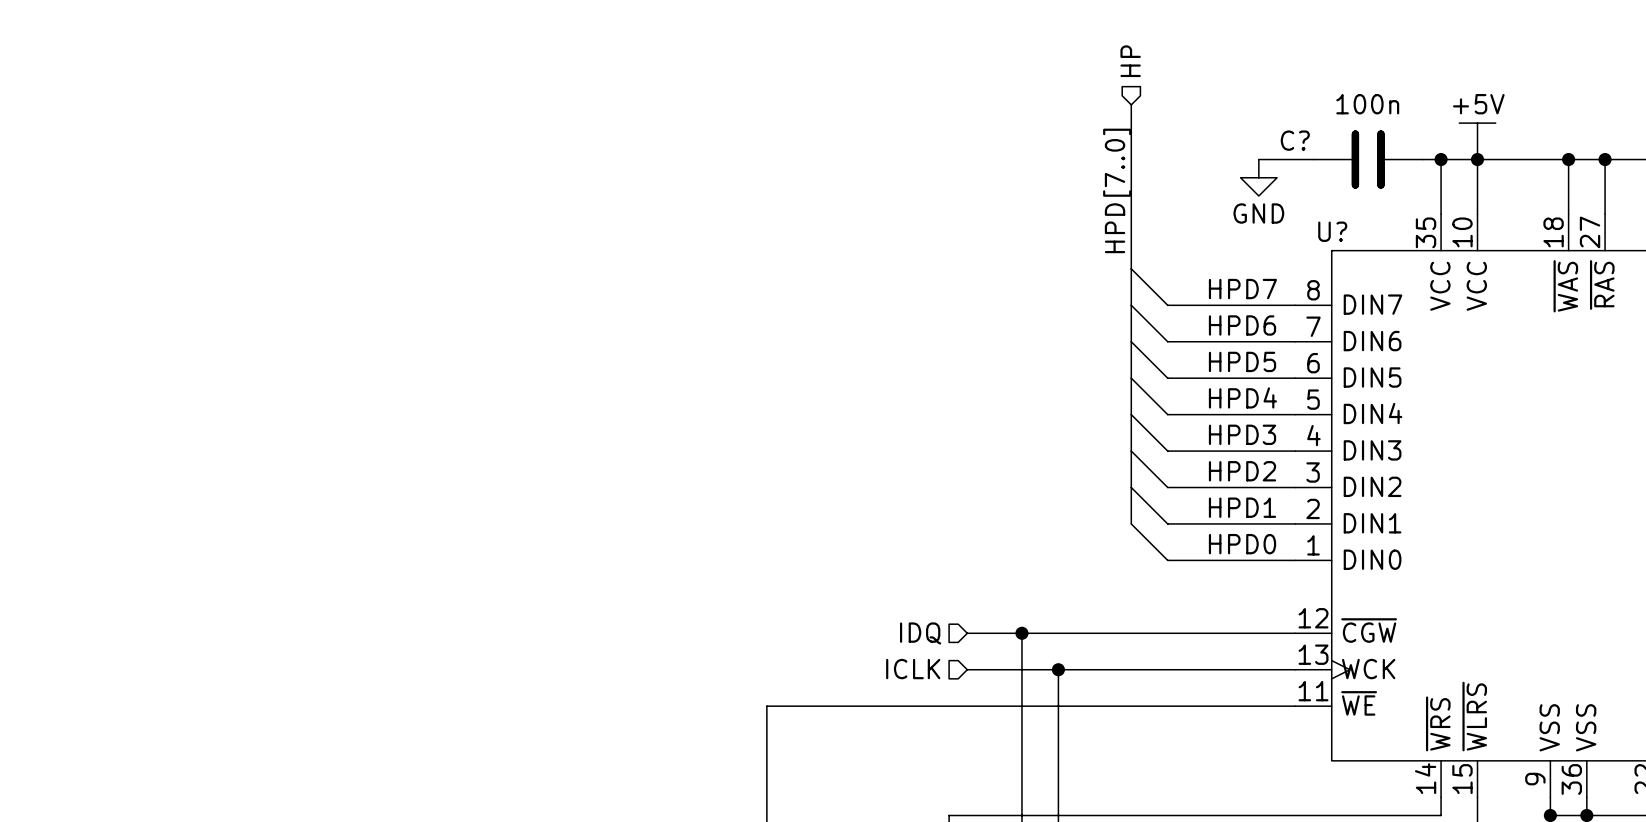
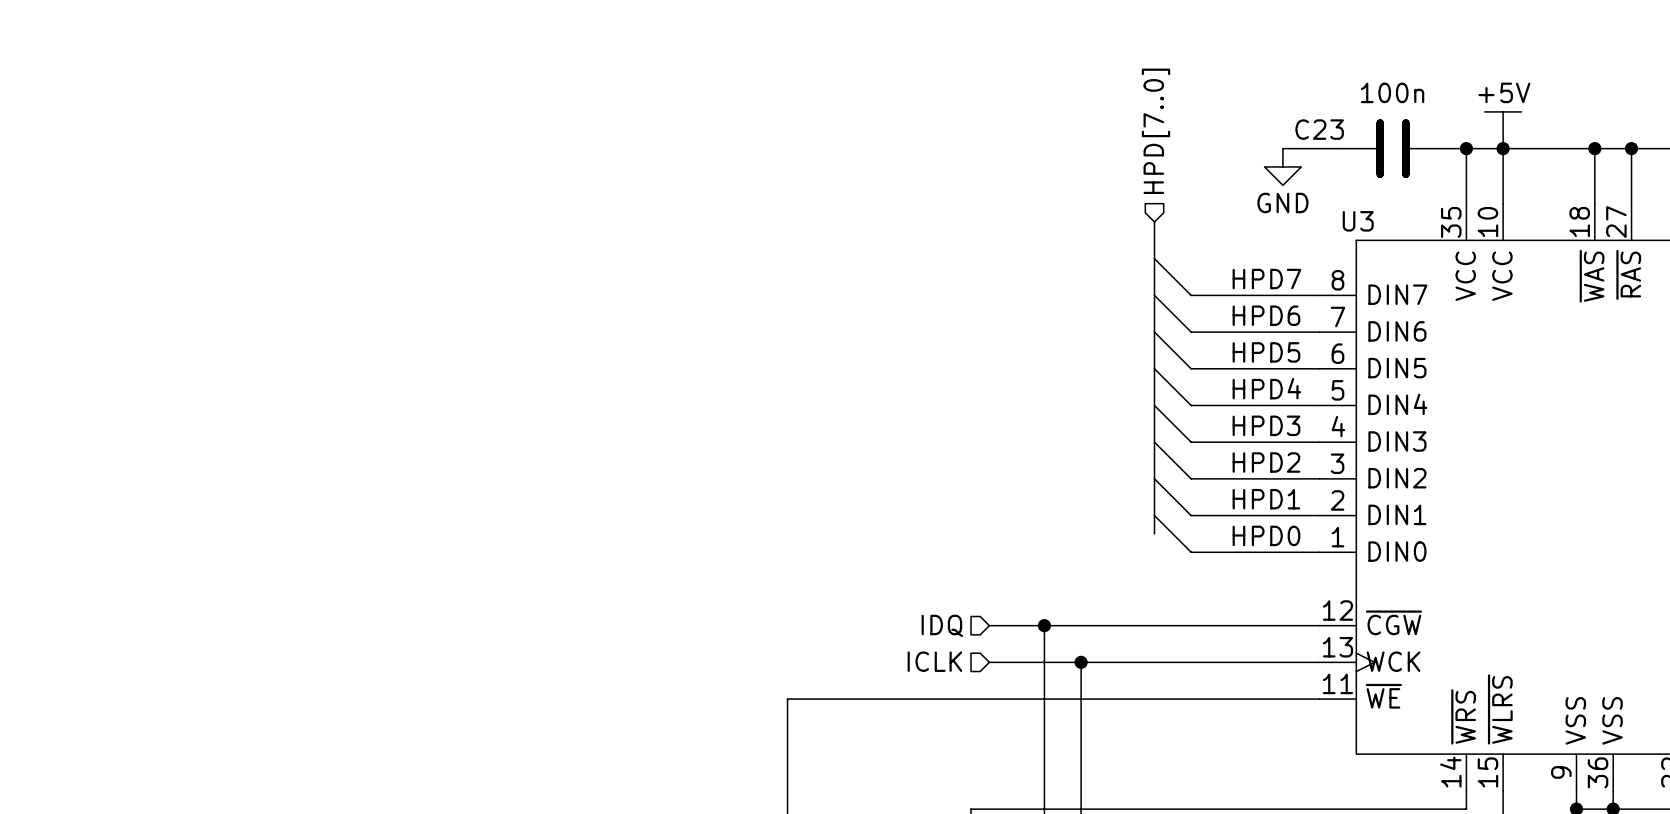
hierarchical label: HP (1130, 61) -> none
bus: (1131, 104) (1131, 232) -> none
C? name: C? (1295, 140) -> C23 (1319, 129)
hierarchical label: none -> HPD[7..0] (1155, 131)
label: HPD[7..0] (1117, 190) -> none
U? name: U? (1332, 231) -> U3 (1358, 221)
bus: none -> (1154, 515) (1154, 533)

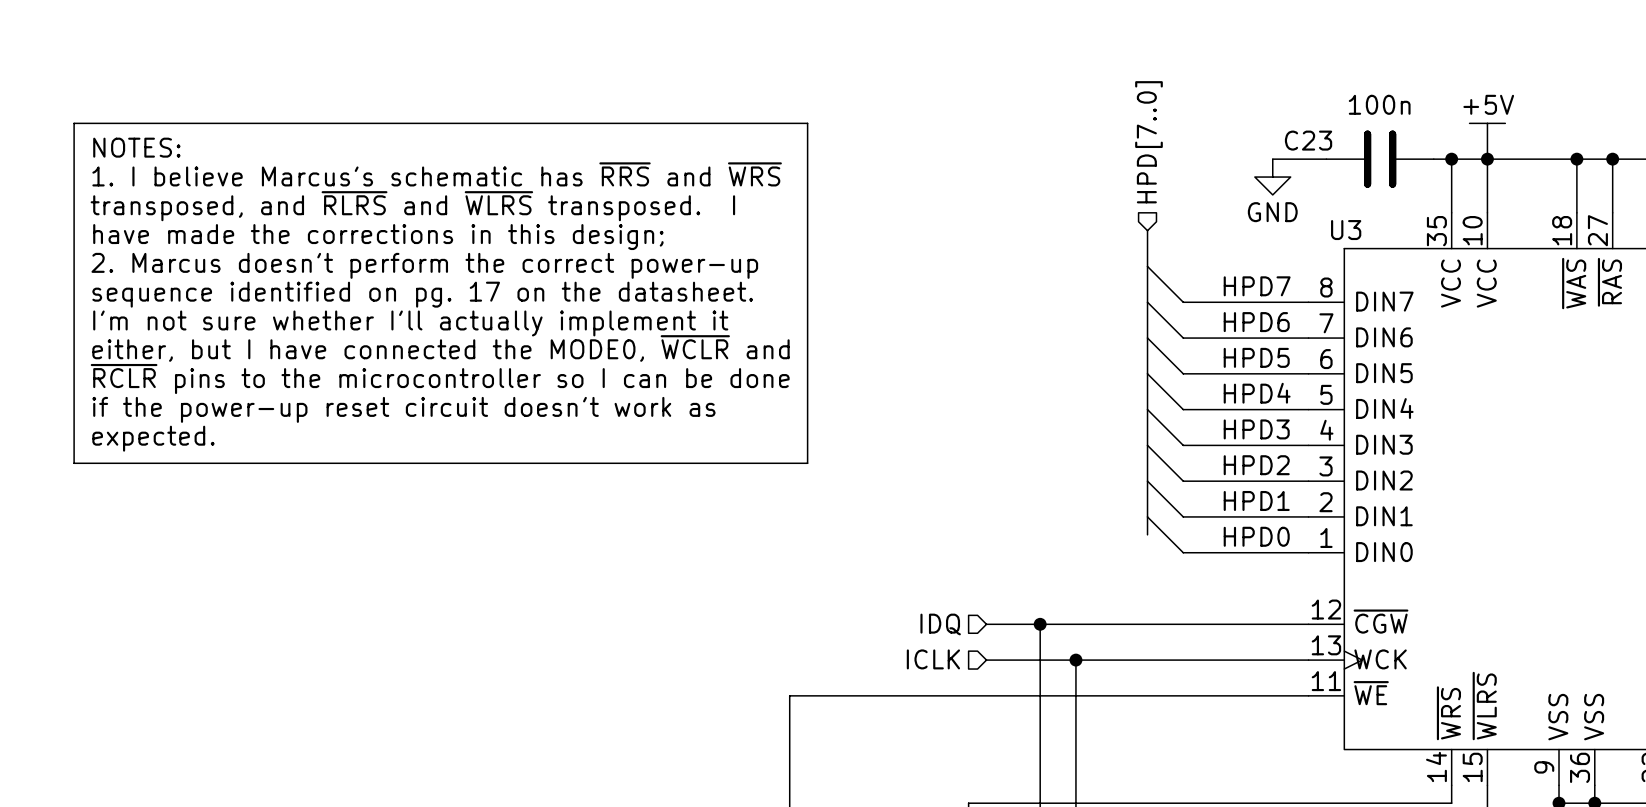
line: none -> (74, 123) (807, 123) (807, 463) (74, 463) (74, 123)
text: none -> NOTES: (136, 147)
text: none -> 1. I believe Marcus's schematic has ~{RRS} and ~{WRS} (437, 174)
text: none -> transposed, and ~{RLRS} and ~{WLRS} transposed. I (412, 206)
text: none -> have made the corrections in this design; (378, 237)
text: none -> 2. Marcus doesn't perform the correct power-up (424, 265)
text: none -> sequence identified on pg. 17 on the datasheet. (422, 294)
text: none -> I'm not sure whether I'll actually implement it (410, 323)
text: none -> either, but I have connected the MODE0, ~{WCLR} and (440, 348)
text: none -> ~{RCLR} pins to the microcontroller so I can be done (440, 379)
text: none -> if the power-up reset circuit doesn't work as (403, 409)
text: none -> expected. (153, 438)

